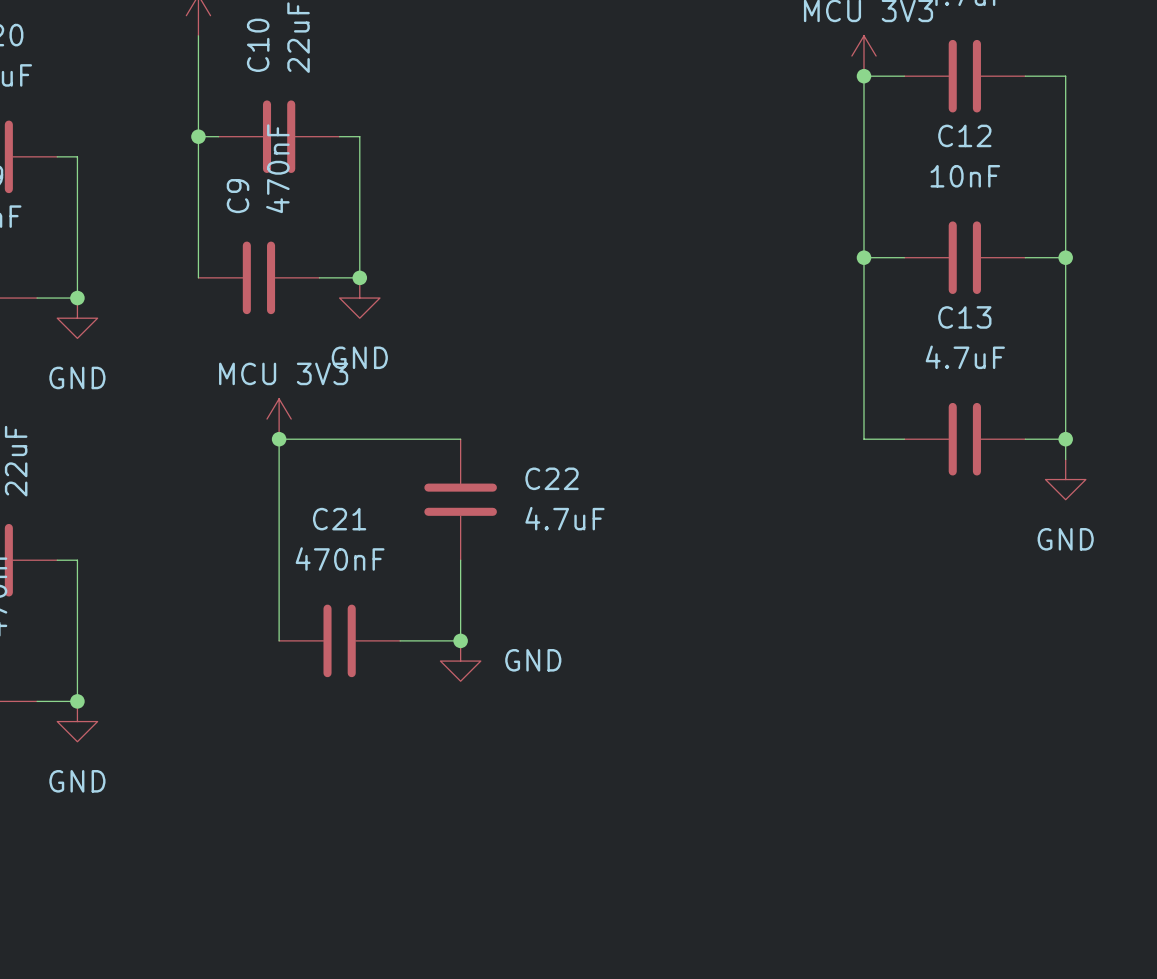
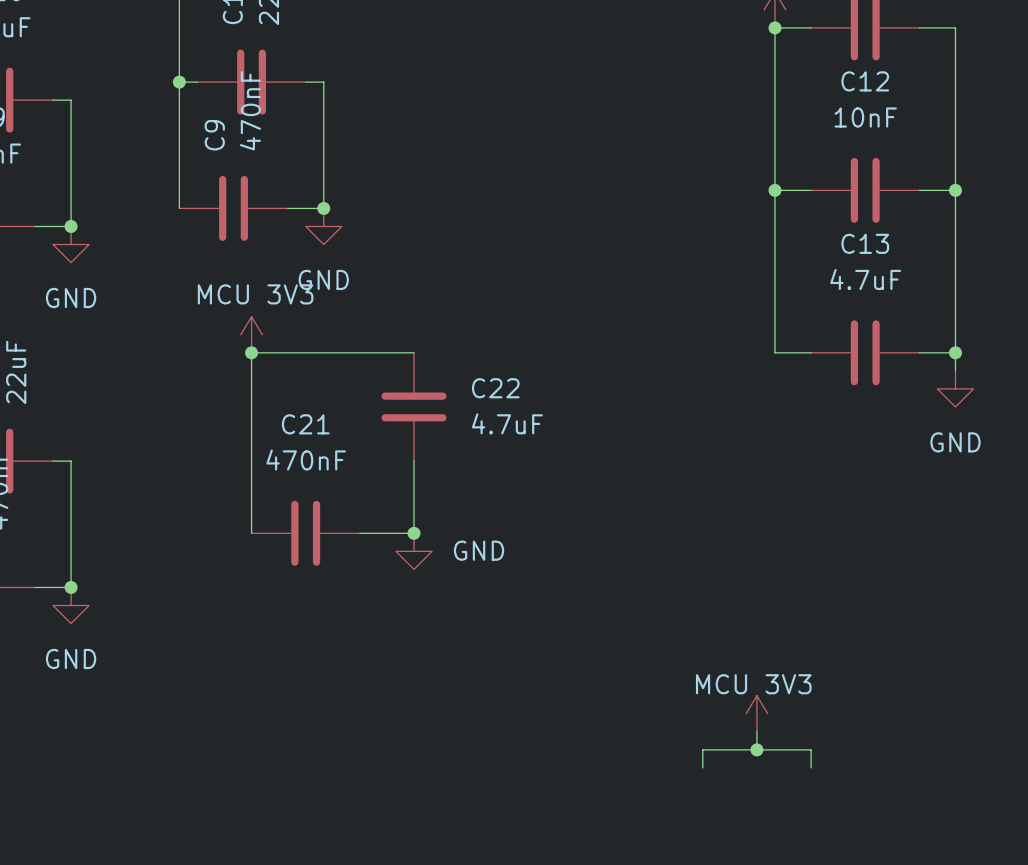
power symbol: none -> MCU 3V3 (756, 713)
wire: none -> (756, 731) (756, 749)
junction: none -> (756, 749)
wire: none -> (702, 767) (702, 749) (811, 749) (811, 767)

